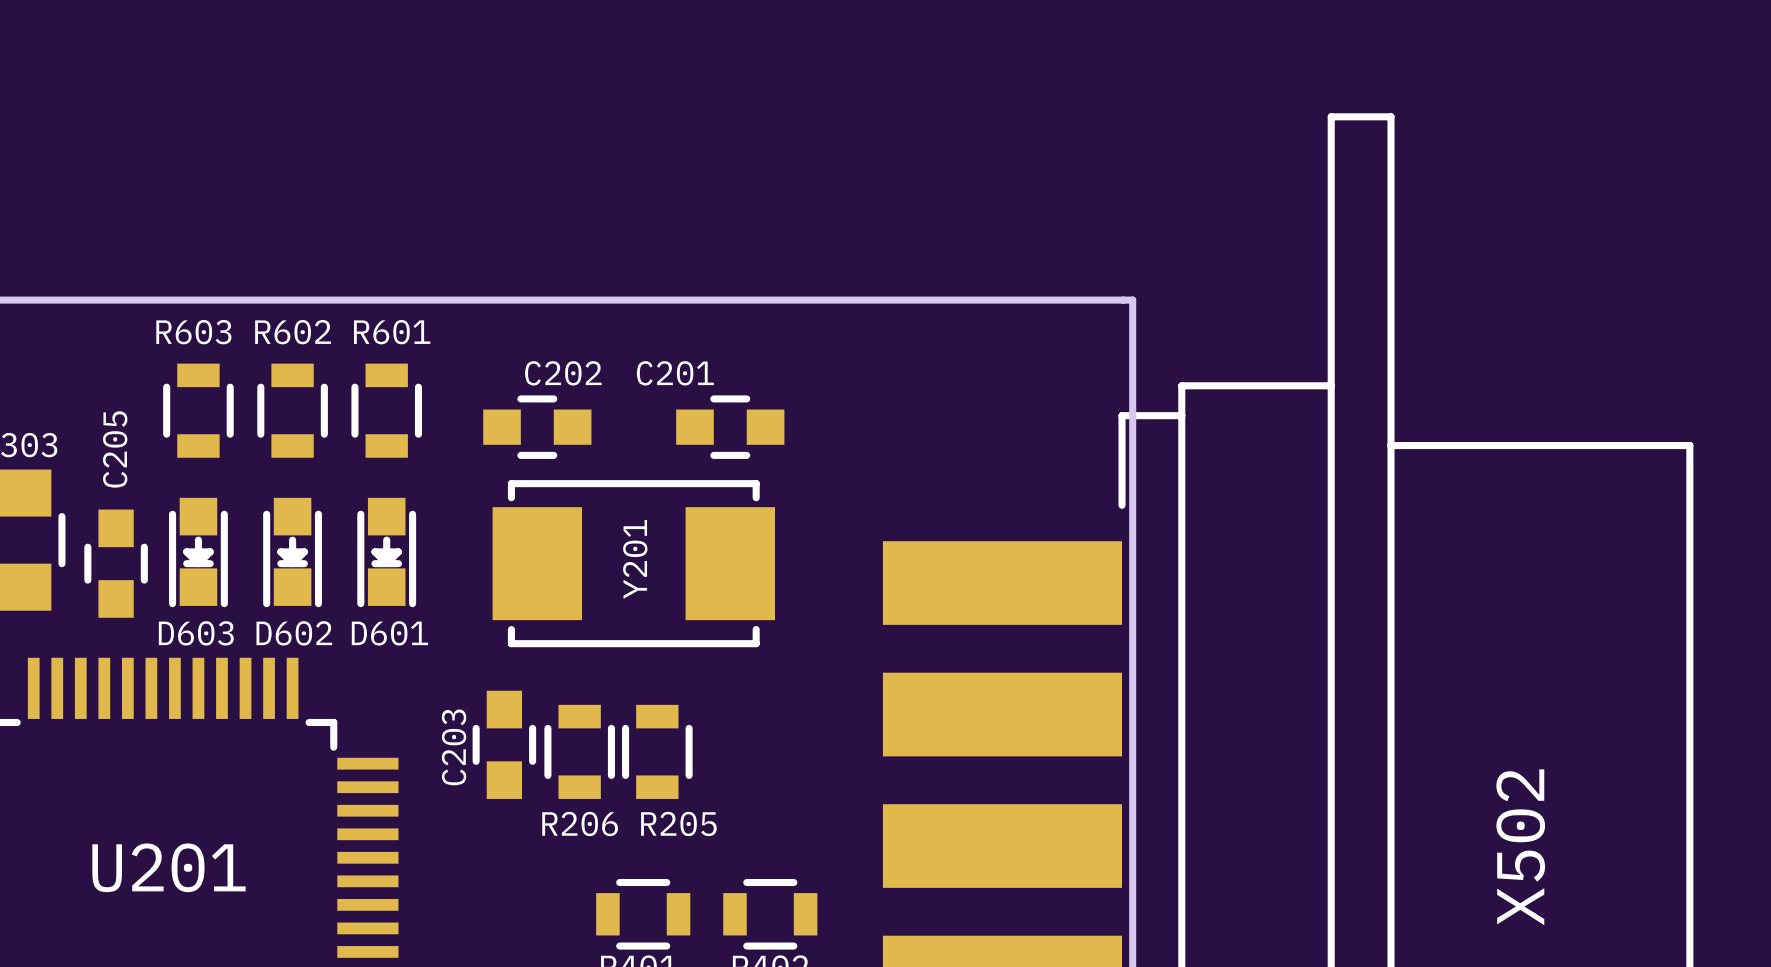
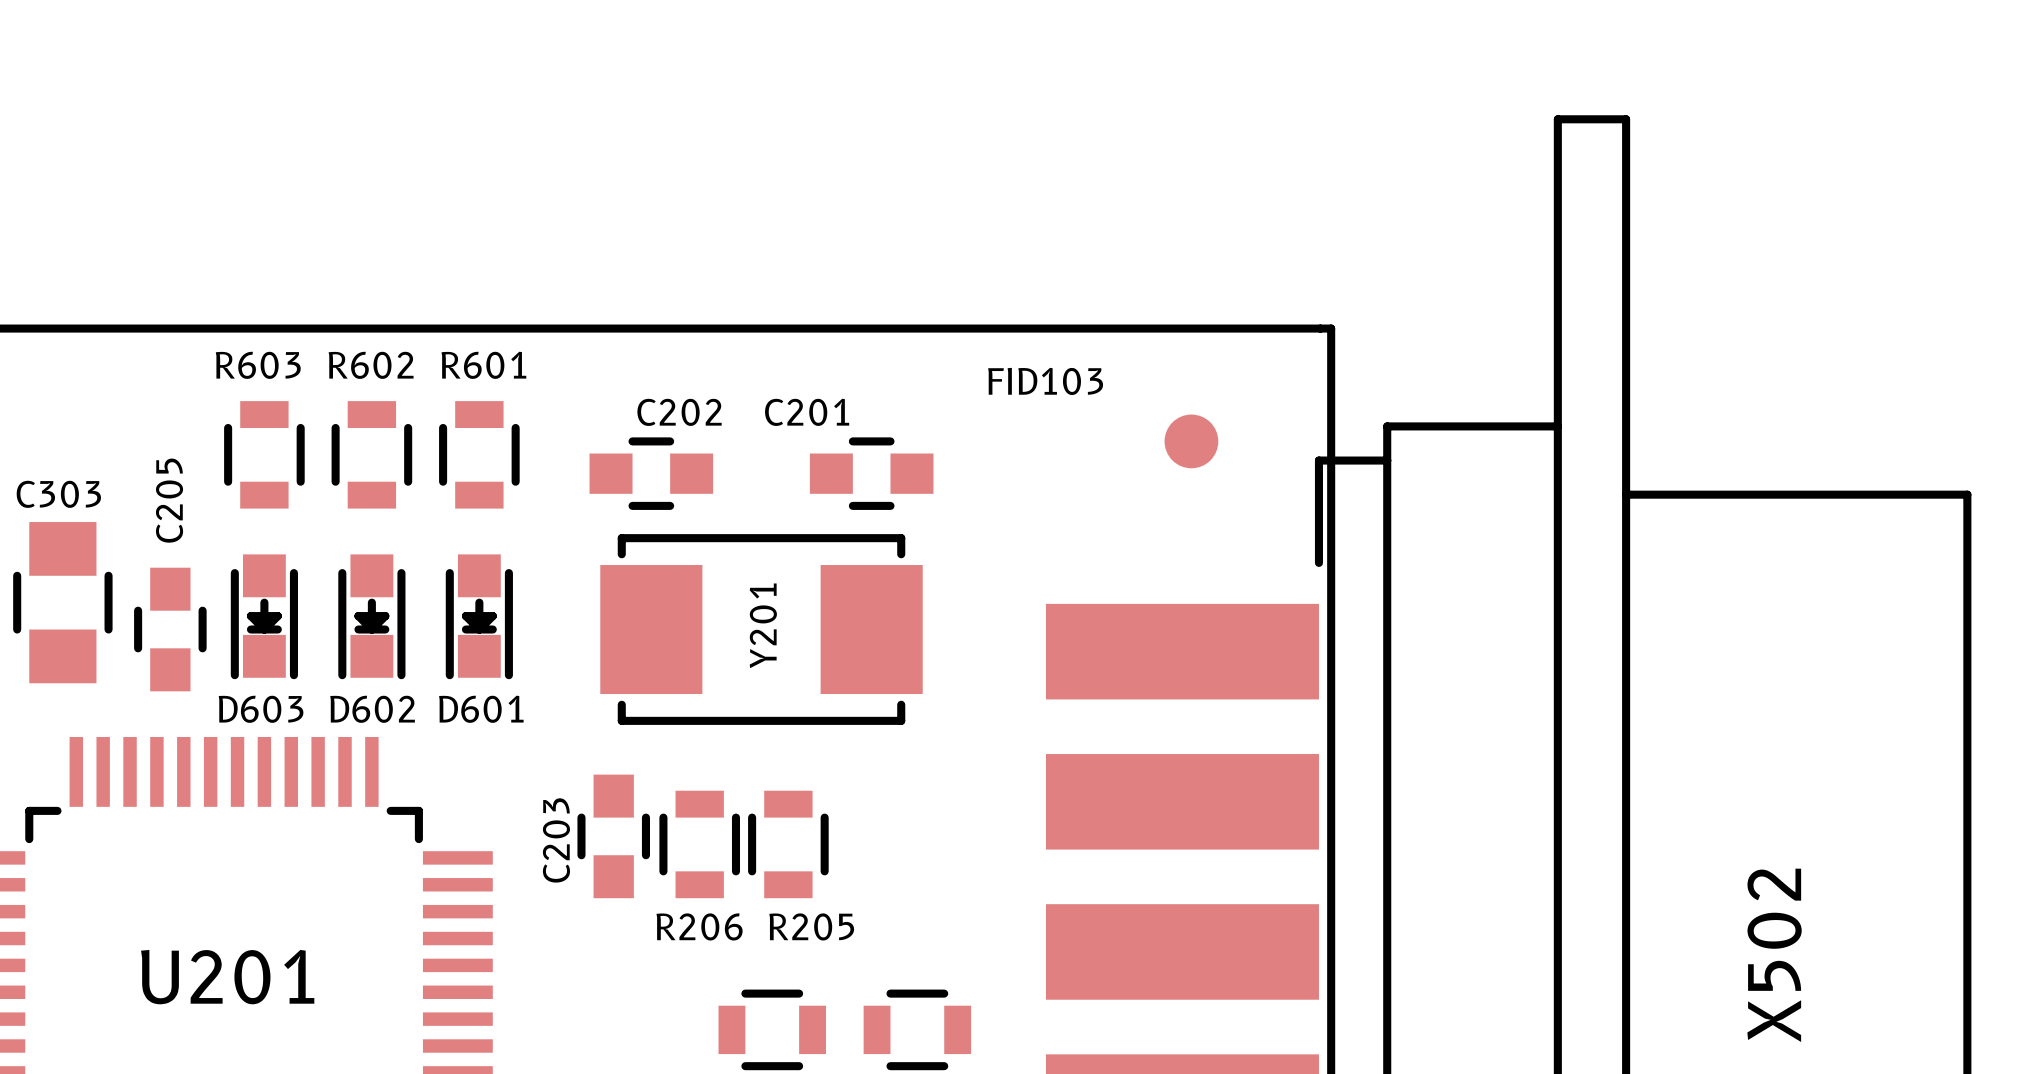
FID103: none -> (1191, 441)

